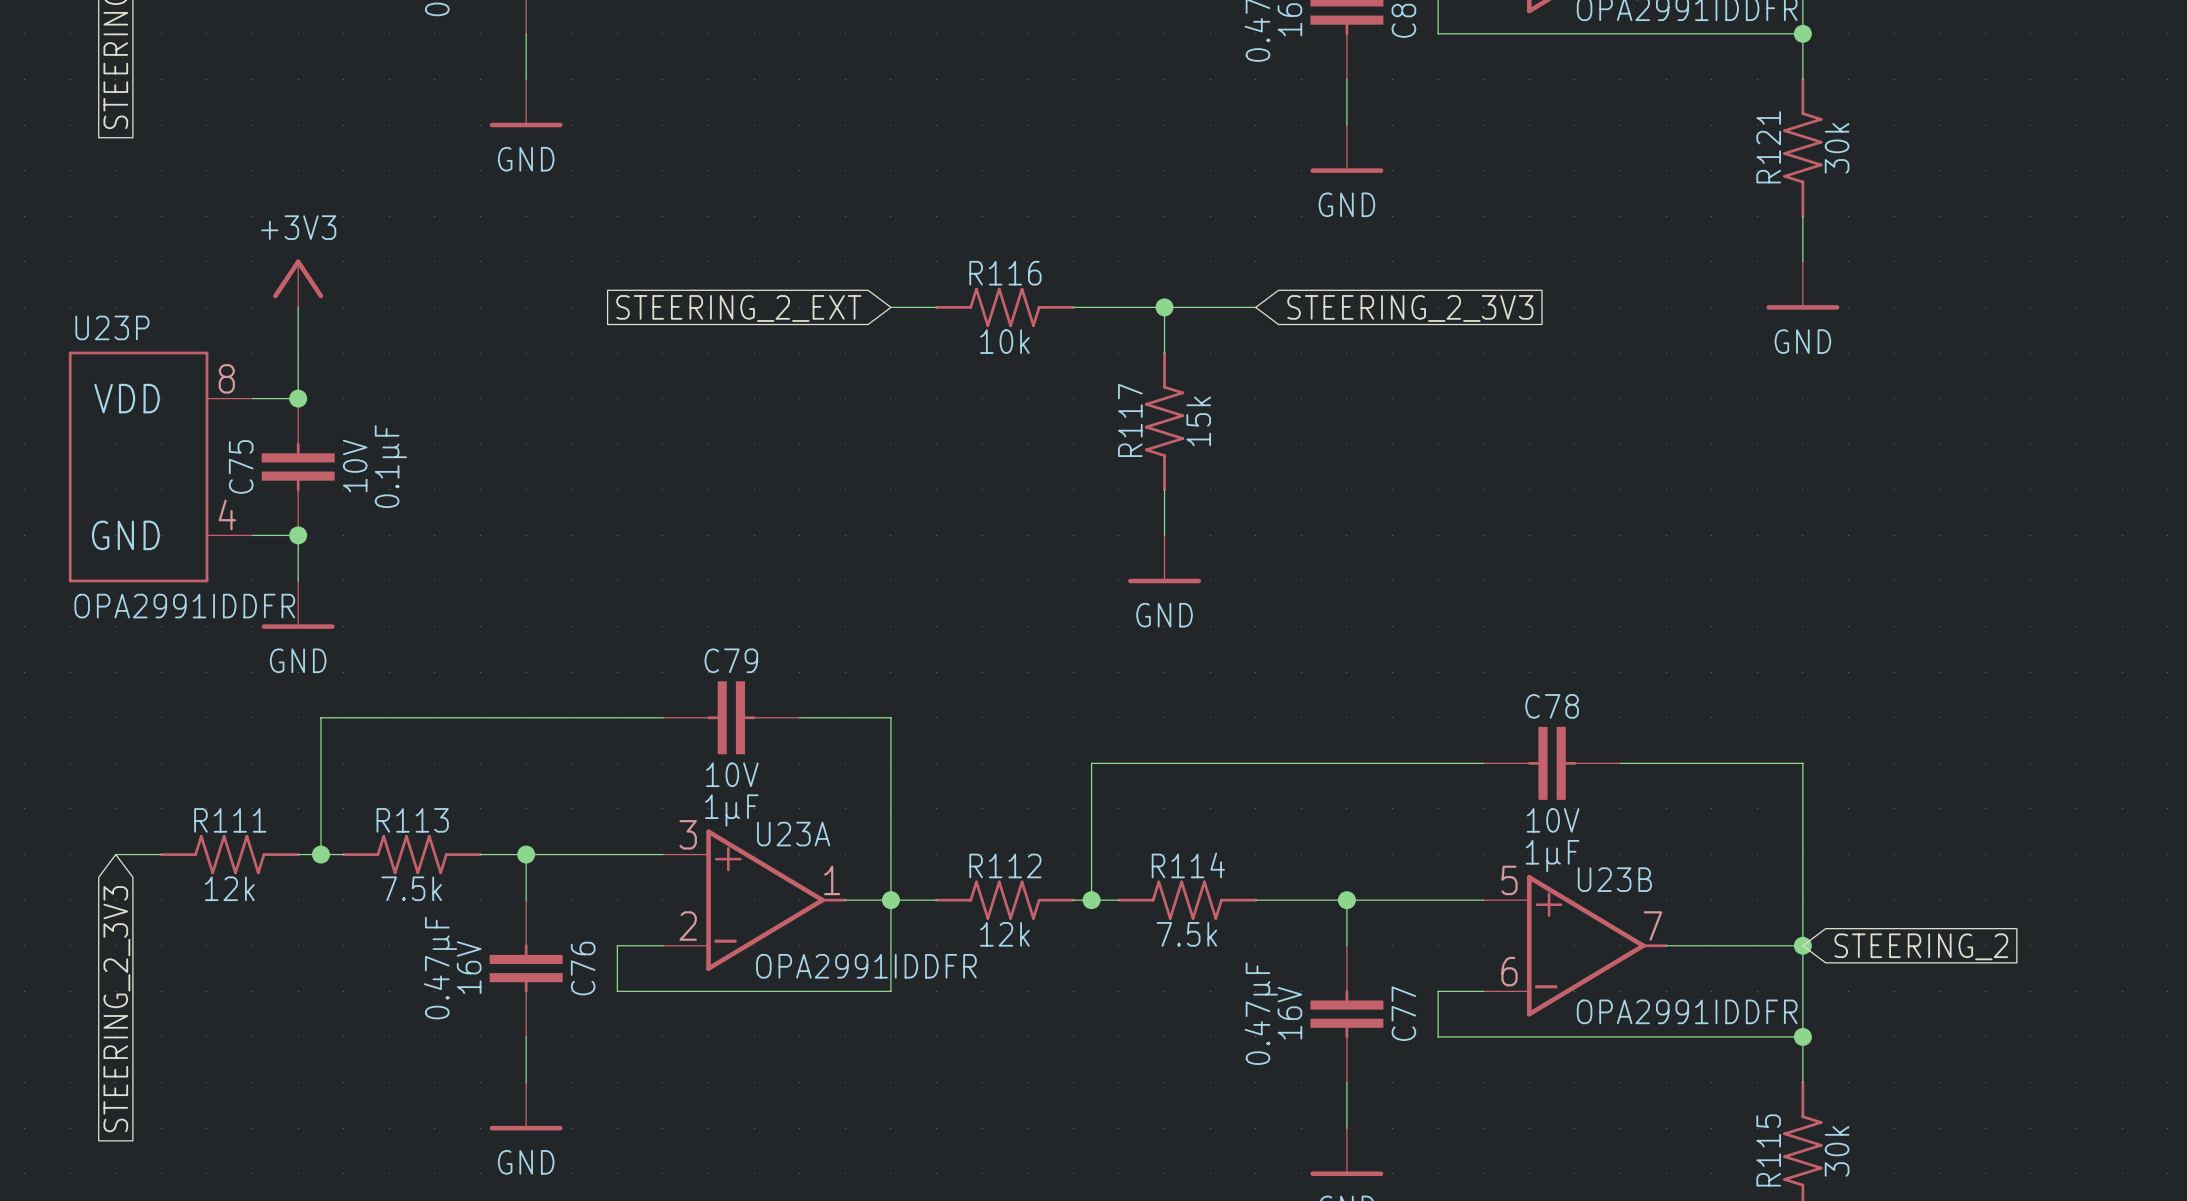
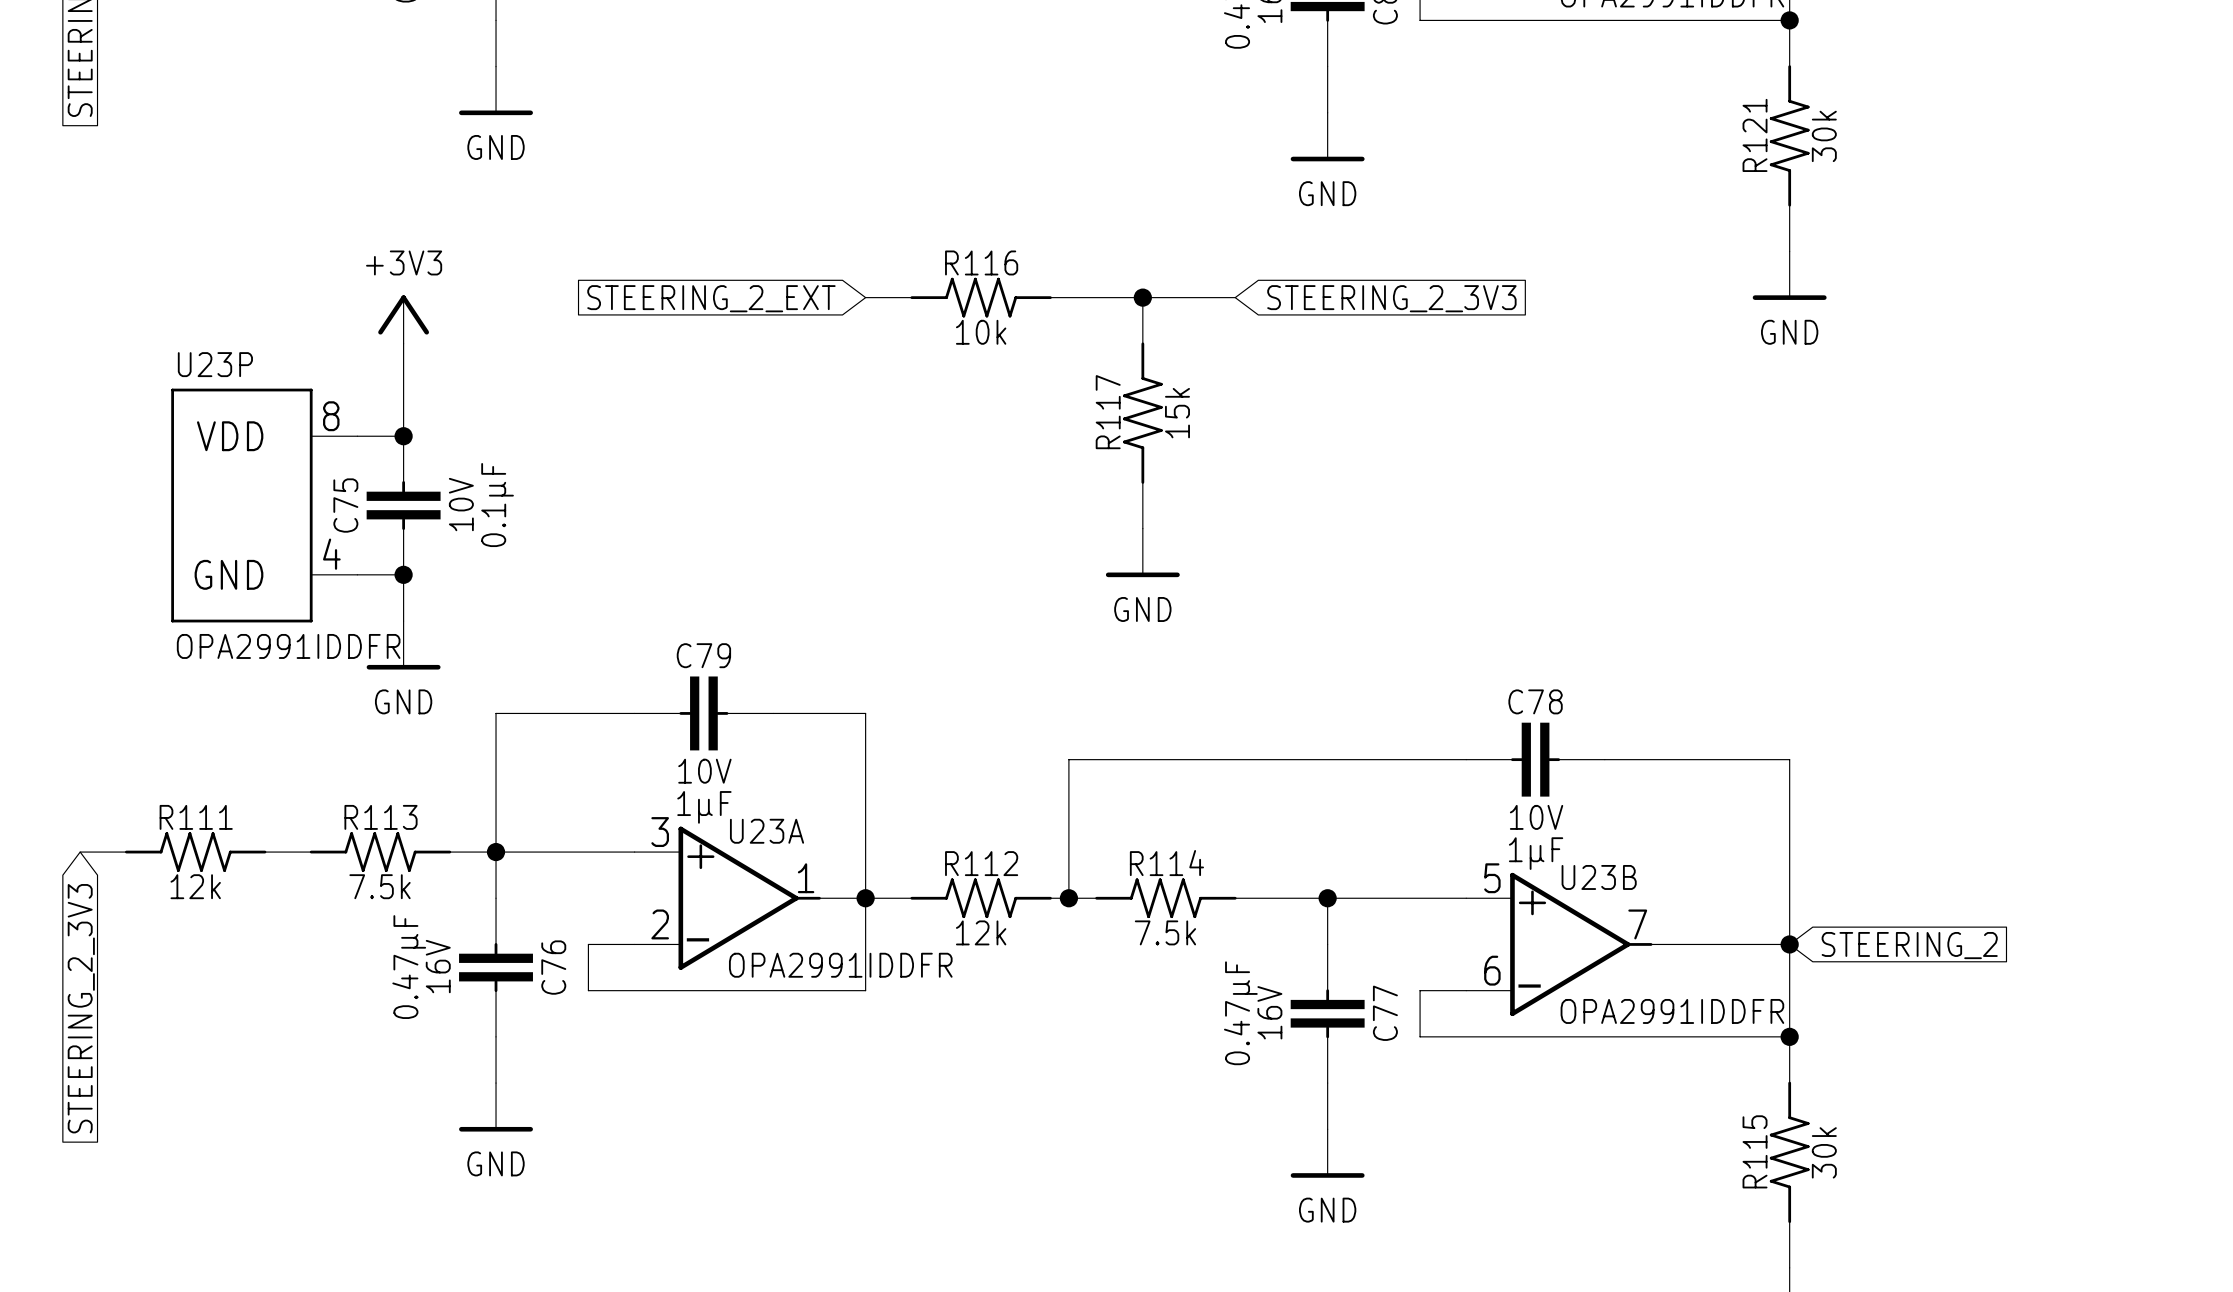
power symbol position: +3V3 (298, 283) -> +3V3 (403, 319)
wire: (298, 307) (298, 398) (252, 398) -> (403, 343) (403, 436) (357, 436)
junction: (298, 398) -> none
junction: none -> (403, 436)
U23P position: (160, 466) -> (264, 505)
C75 position: (298, 466) -> (403, 505)
wire: (252, 535) (298, 535) (298, 580) -> (357, 574) (403, 574) (403, 621)
junction: (298, 535) -> none
junction: none -> (403, 574)
power symbol position: GND (298, 604) -> GND (403, 645)
wire: (526, 717) (320, 717) (320, 854) -> (496, 713) (496, 852)
junction: (320, 854) -> none

